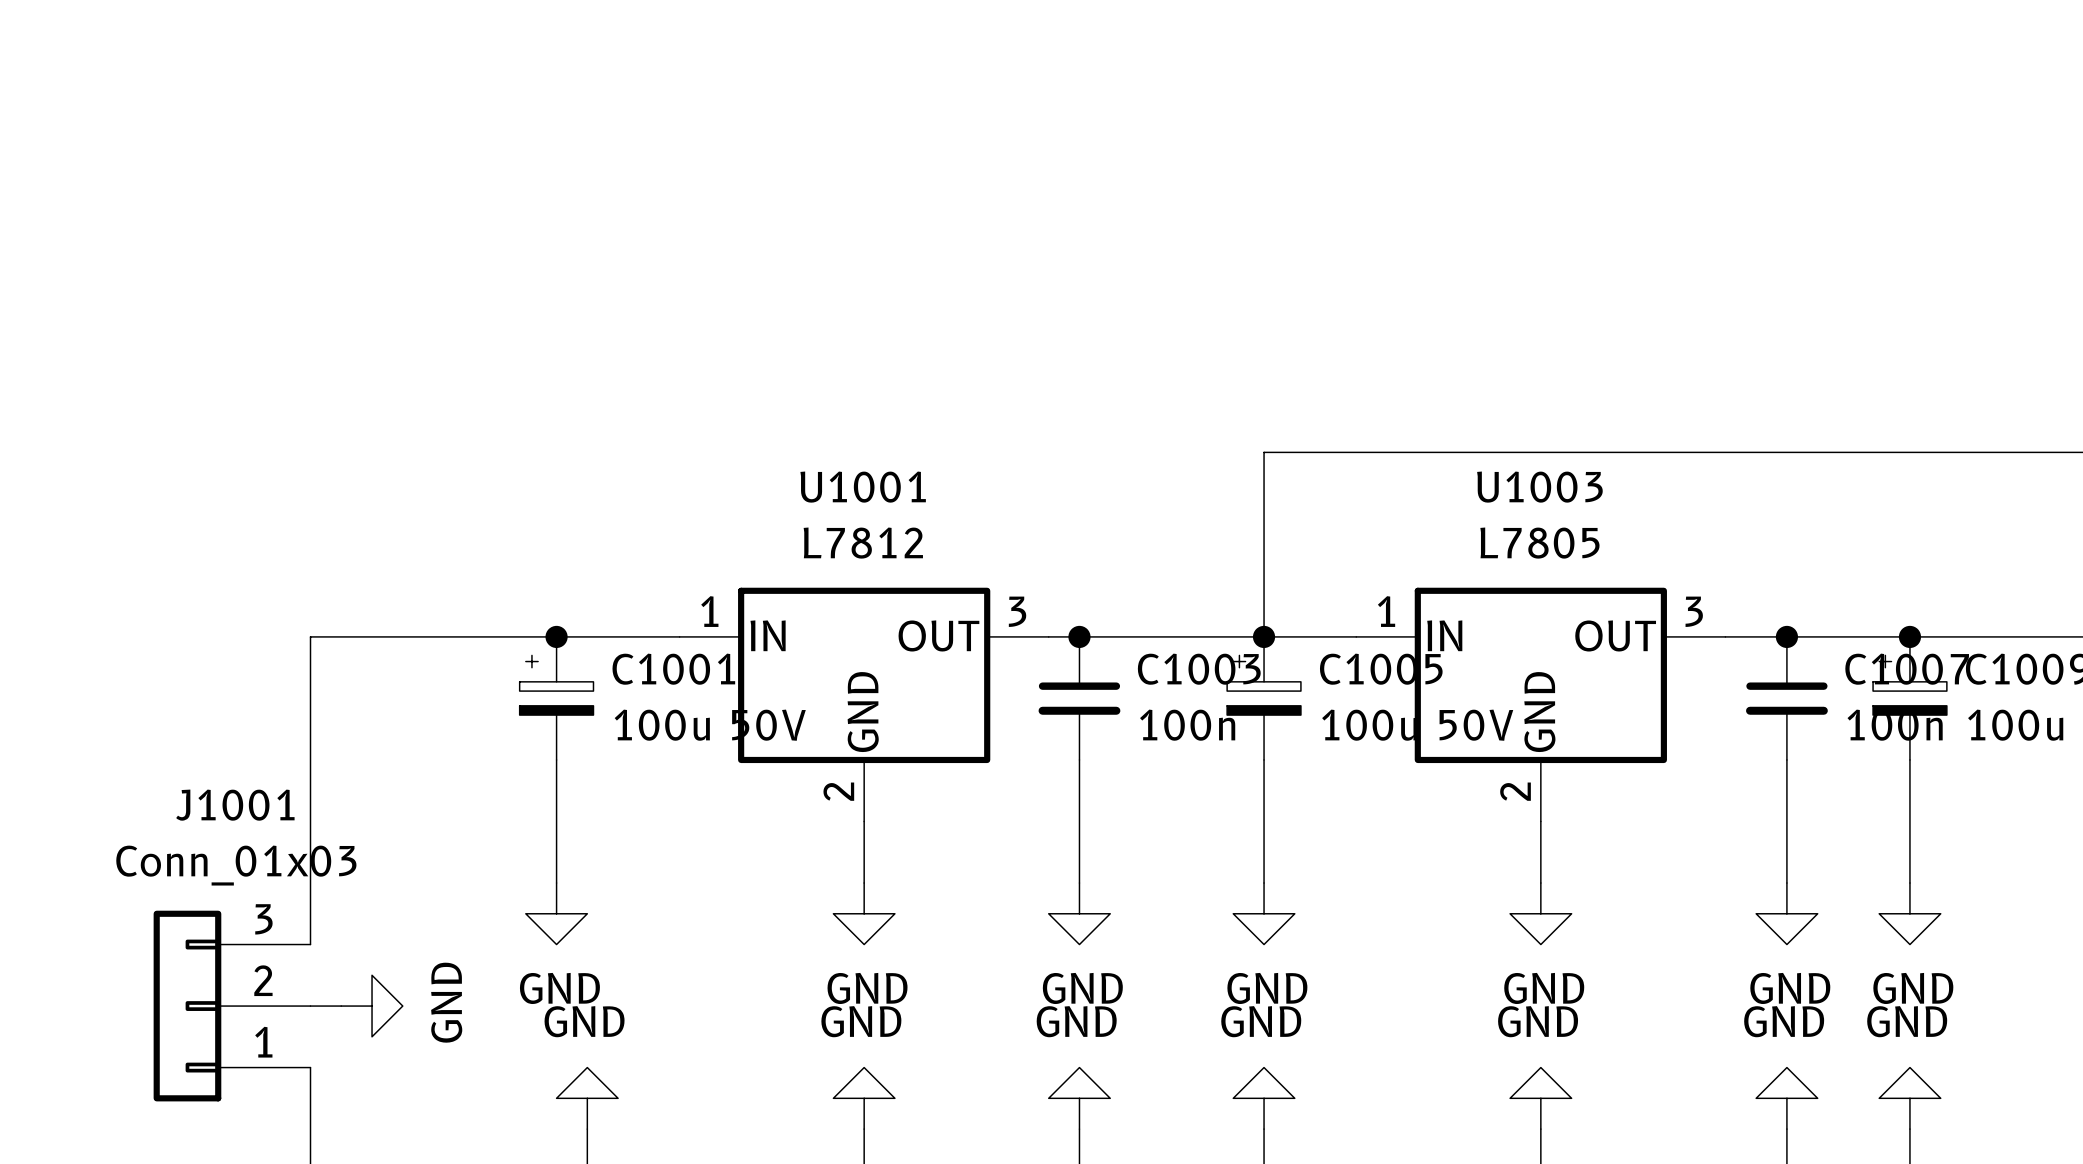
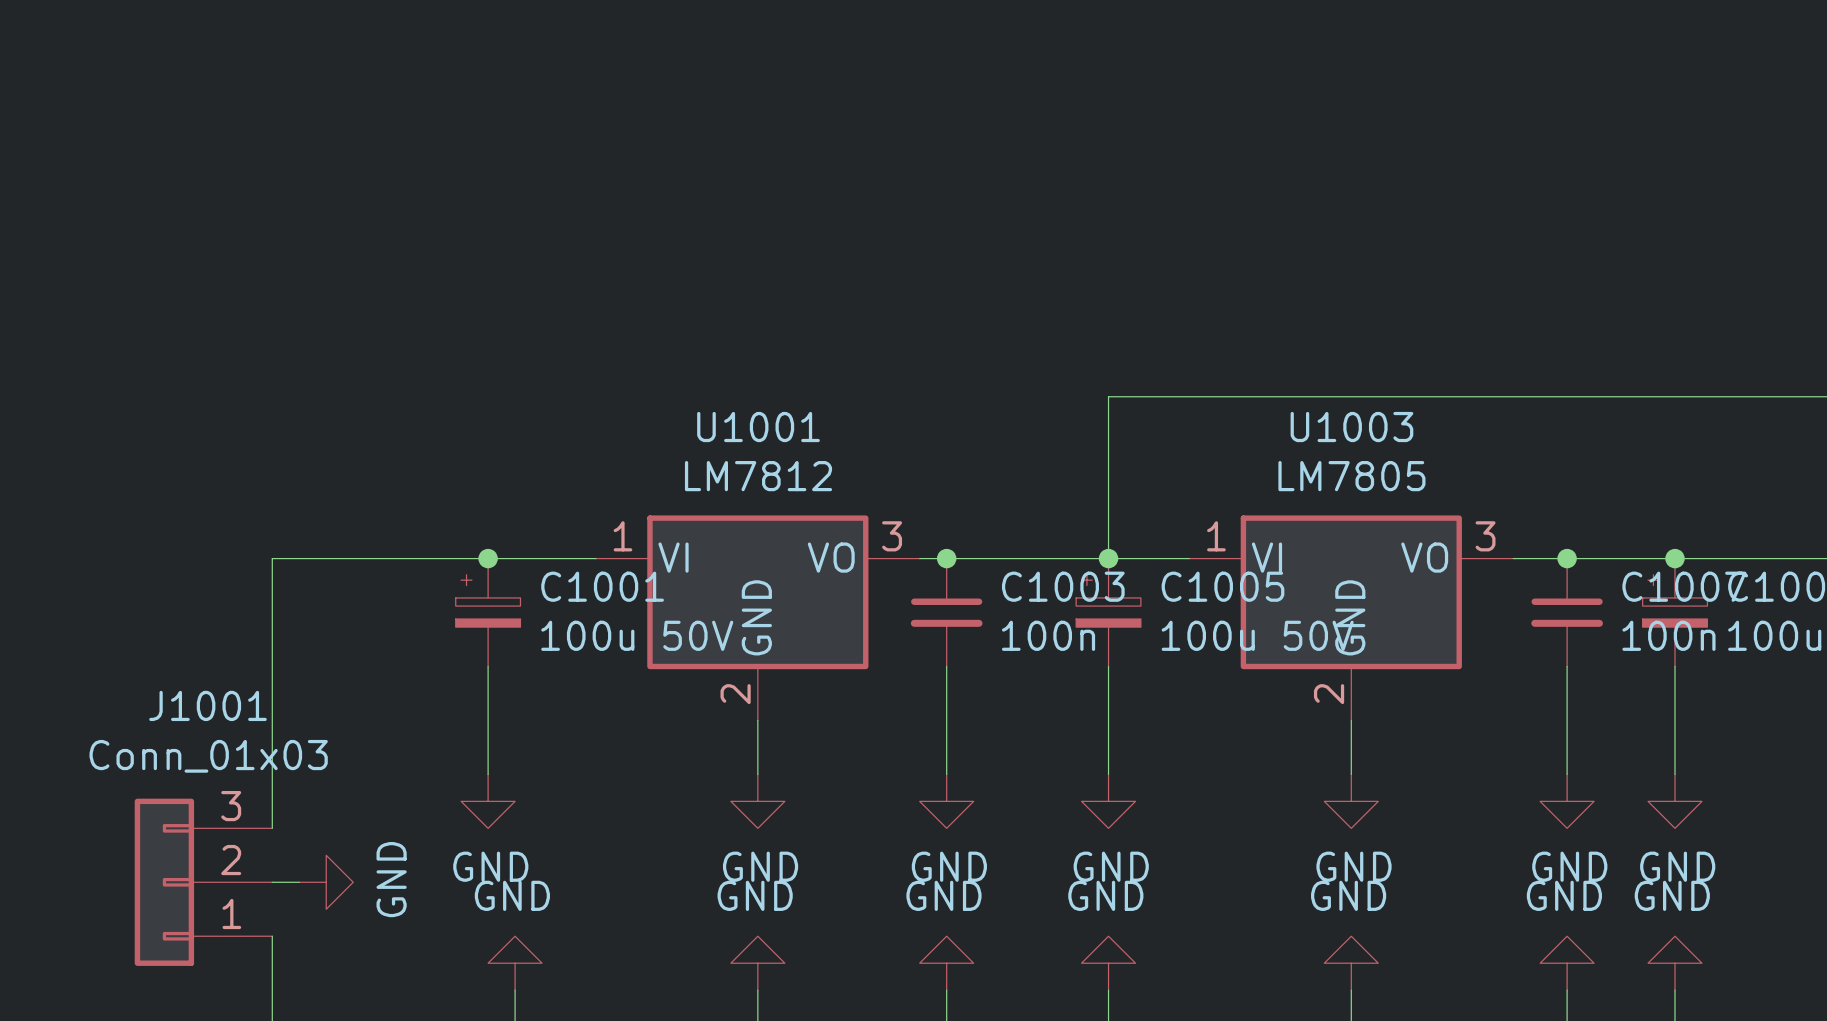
U1001 value: L7812 (863, 543) -> LM7812 (758, 476)
U1003 value: L7805 (1539, 543) -> LM7805 (1351, 476)
U1001 pin name: IN (768, 635) -> VI (673, 557)
U1001 pin name: OUT (938, 635) -> VO (831, 557)
U1003 pin name: IN (1444, 635) -> VI (1266, 557)
U1003 pin name: OUT (1615, 635) -> VO (1424, 557)

